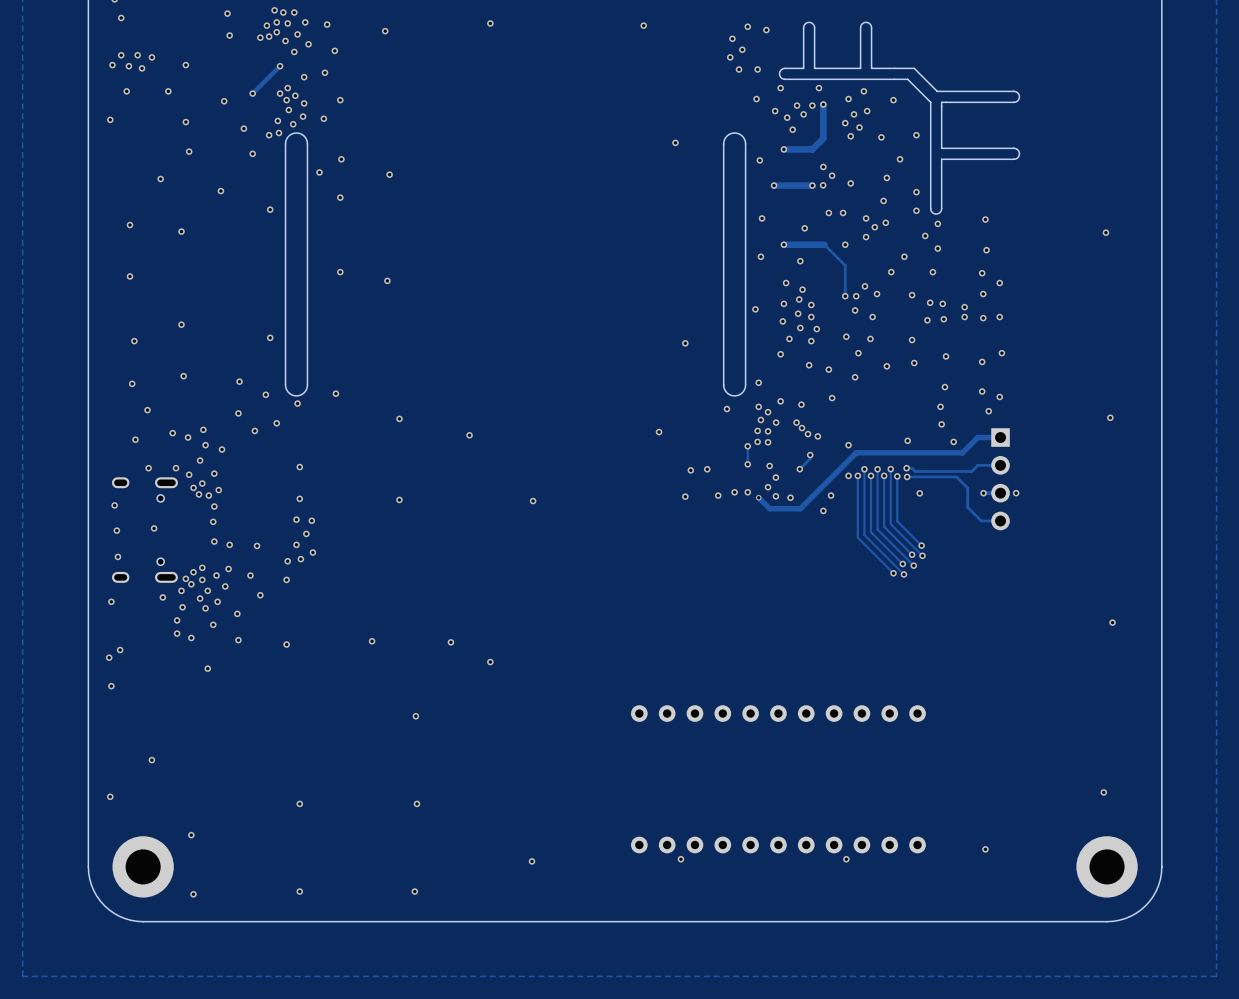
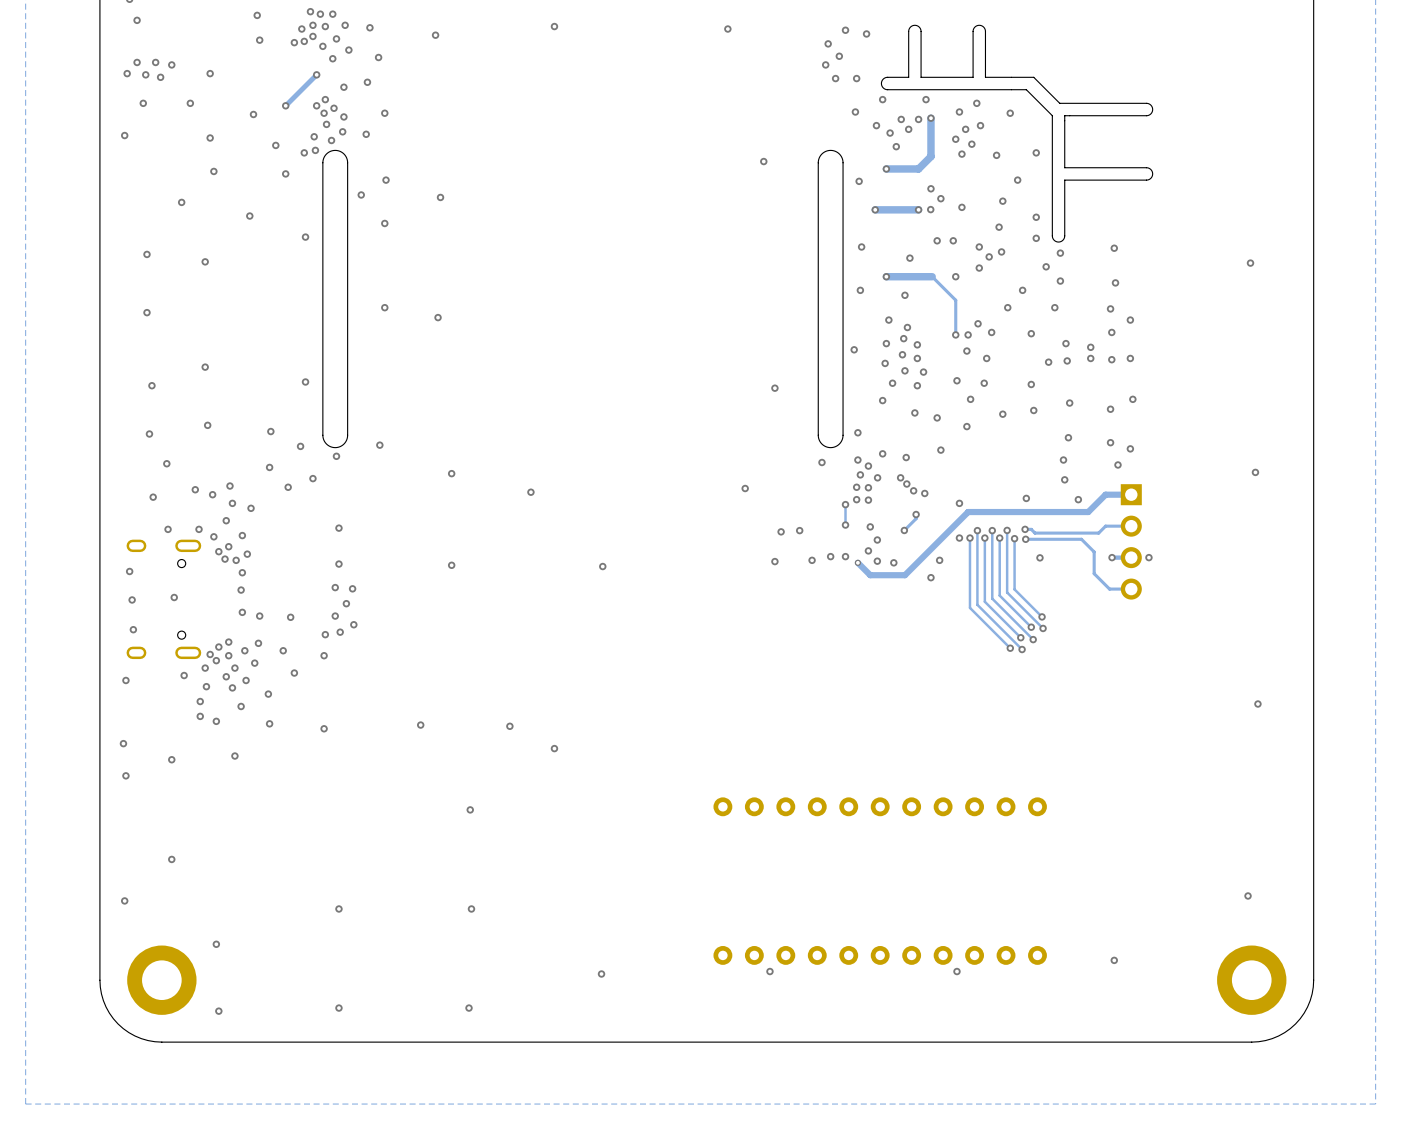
via: (930, 302) -> none
via position: (120, 650) -> (171, 759)

